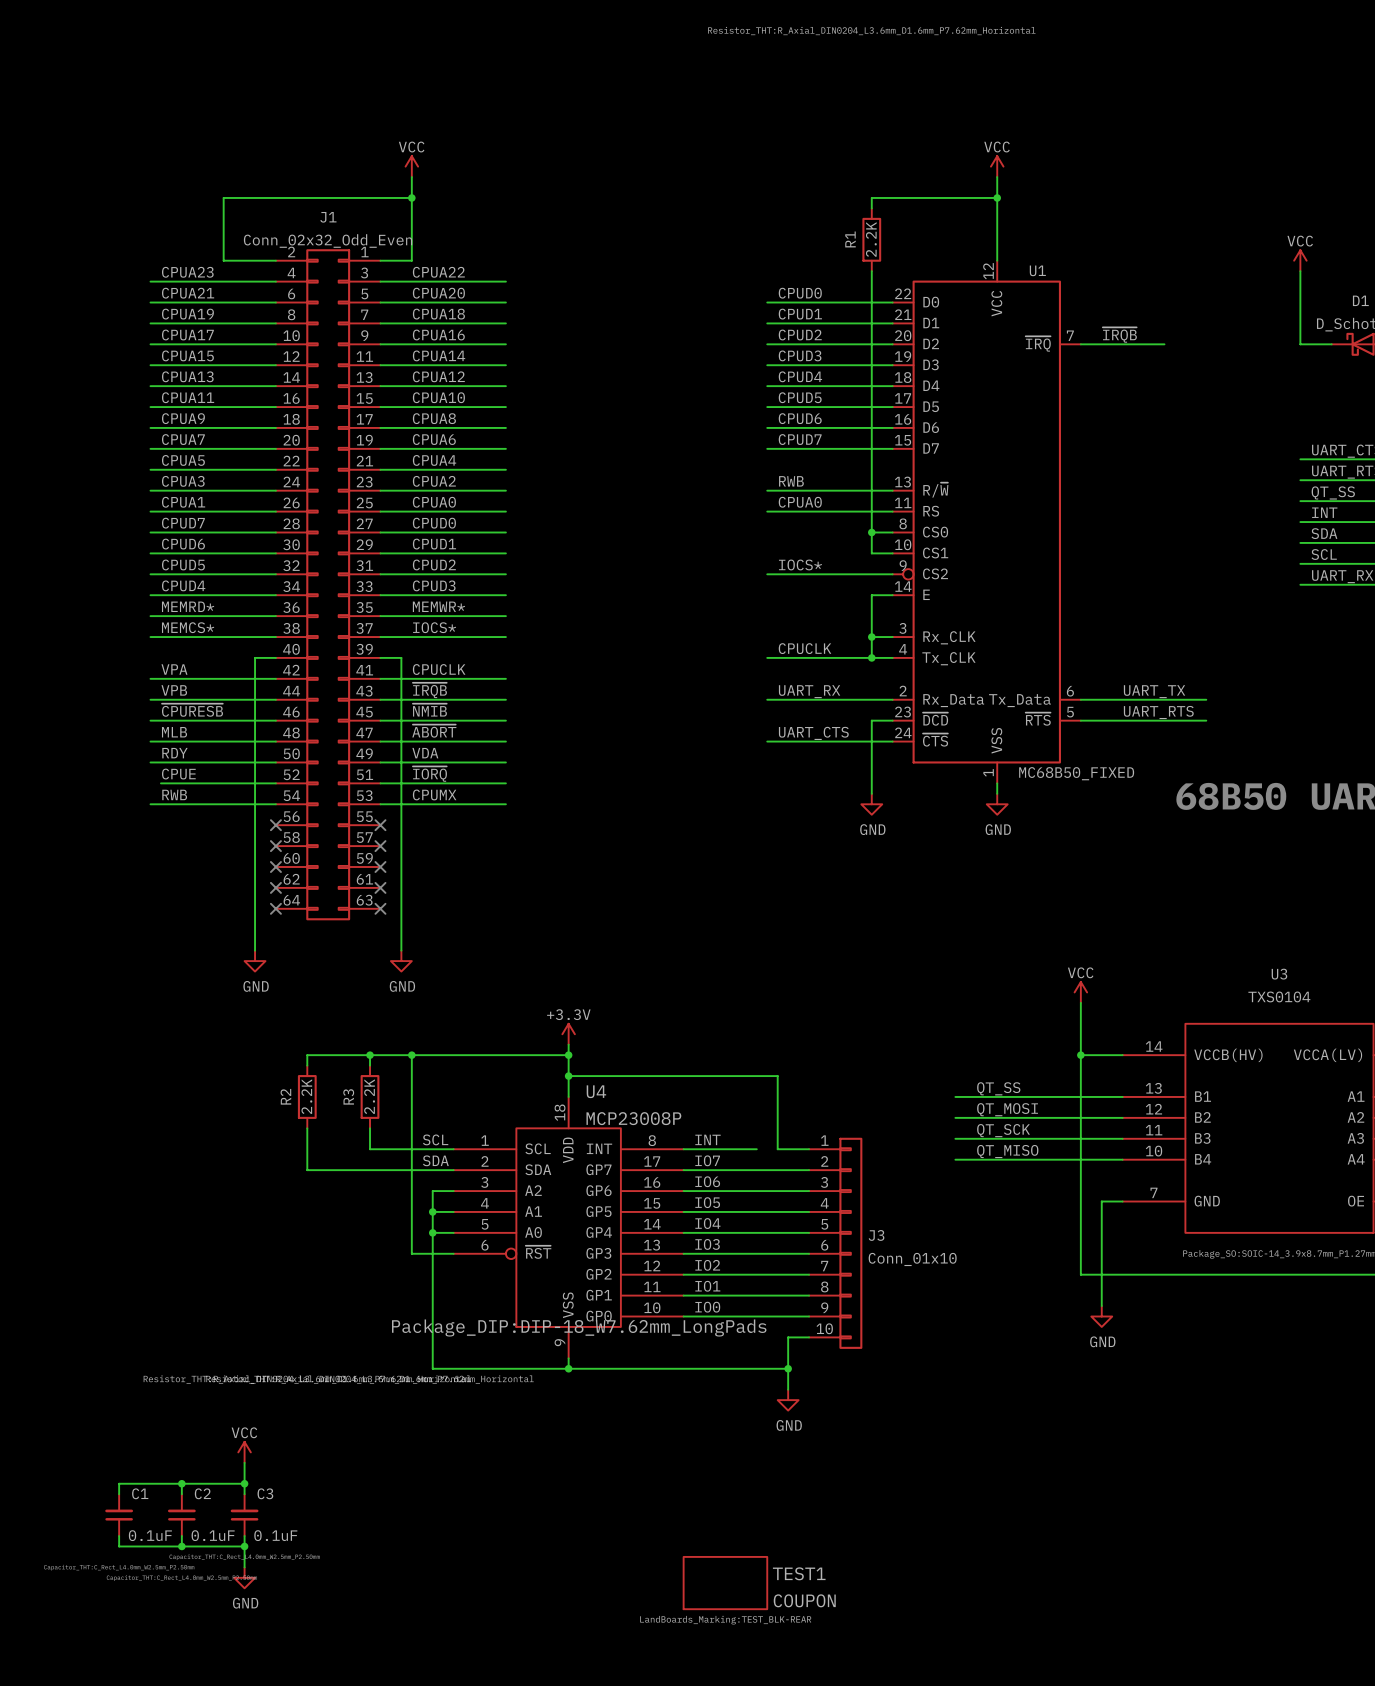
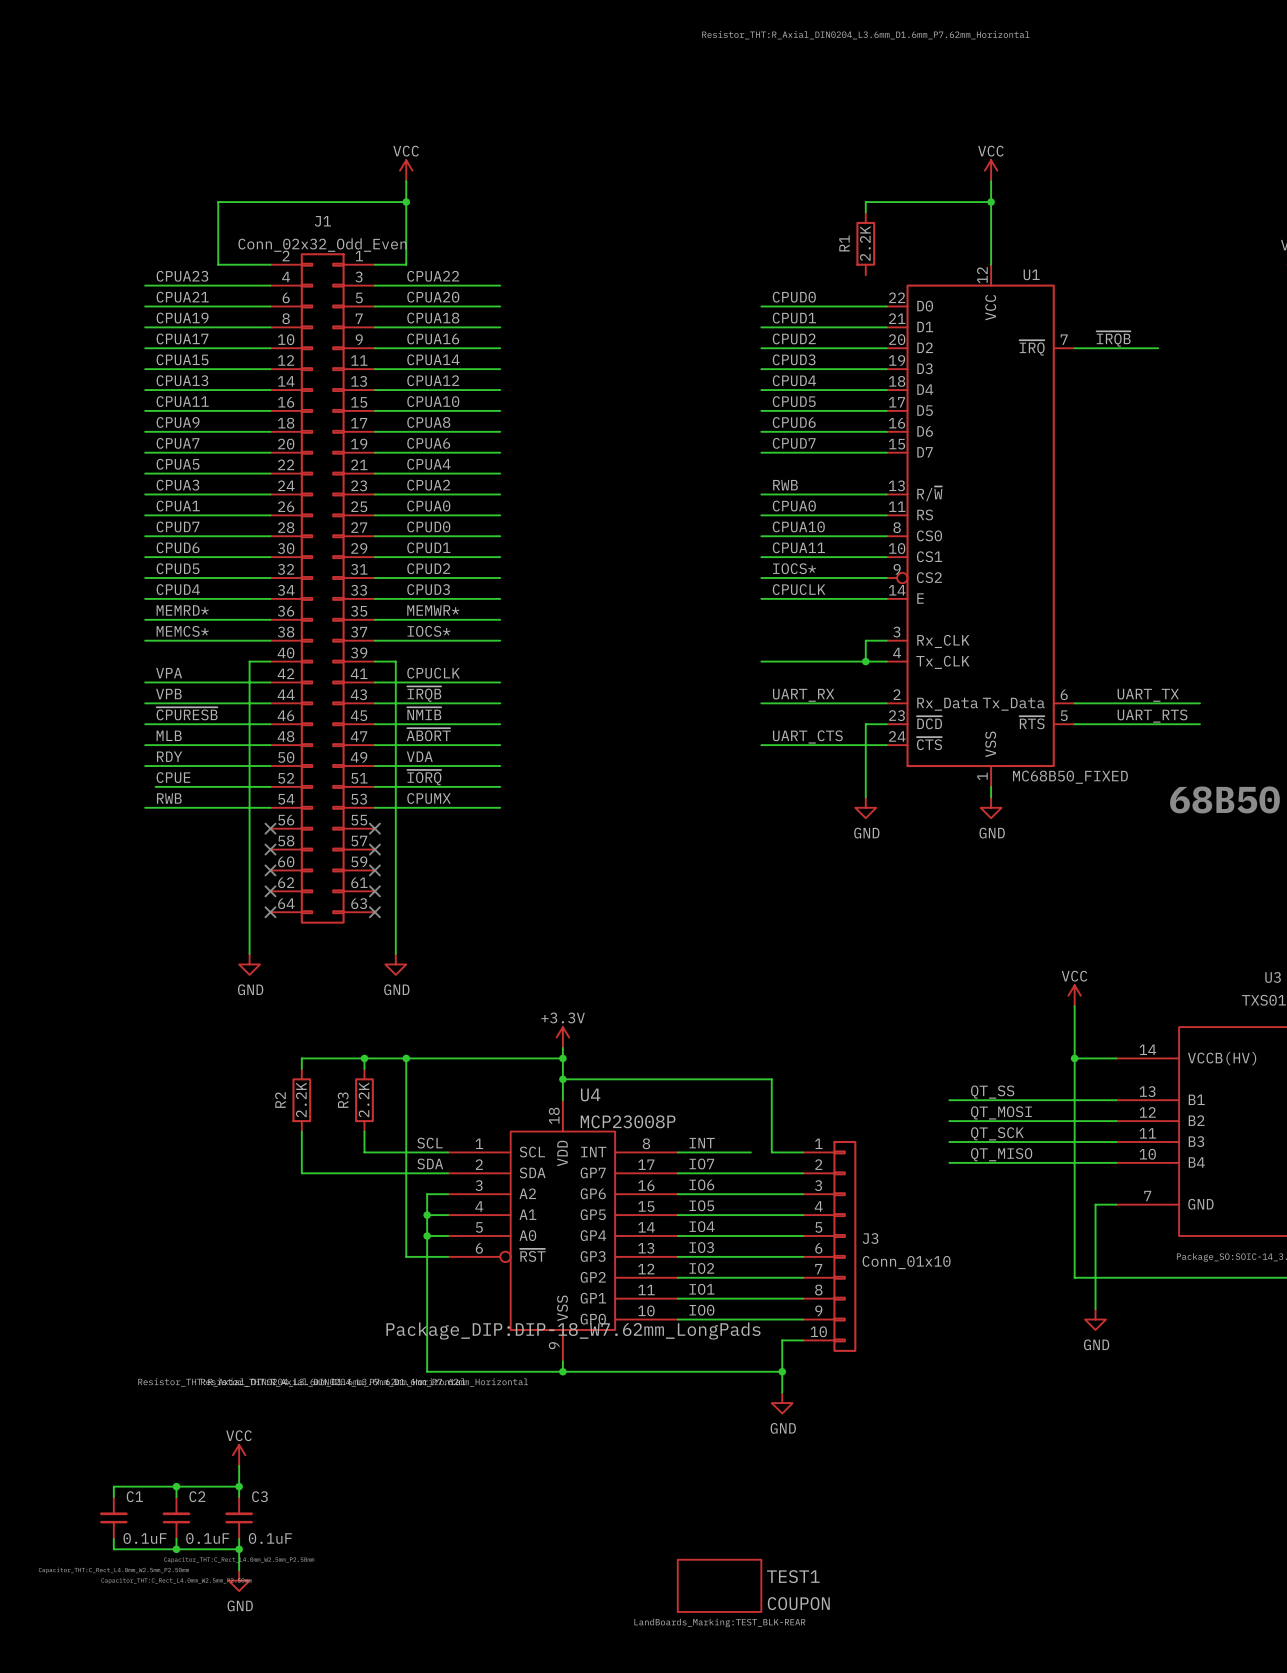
wire: (871, 271) (871, 553) -> (761, 557) (865, 557)
label: none -> CPUA10 (798, 526)
wire: none -> (761, 536) (865, 536)
junction: (871, 532) -> none
label: none -> CPUA11 (798, 547)
wire: (871, 595) (871, 637) -> (865, 598) (761, 598)
junction: (871, 637) -> none
label position: CPUCLK (805, 648) -> CPUCLK (799, 589)

